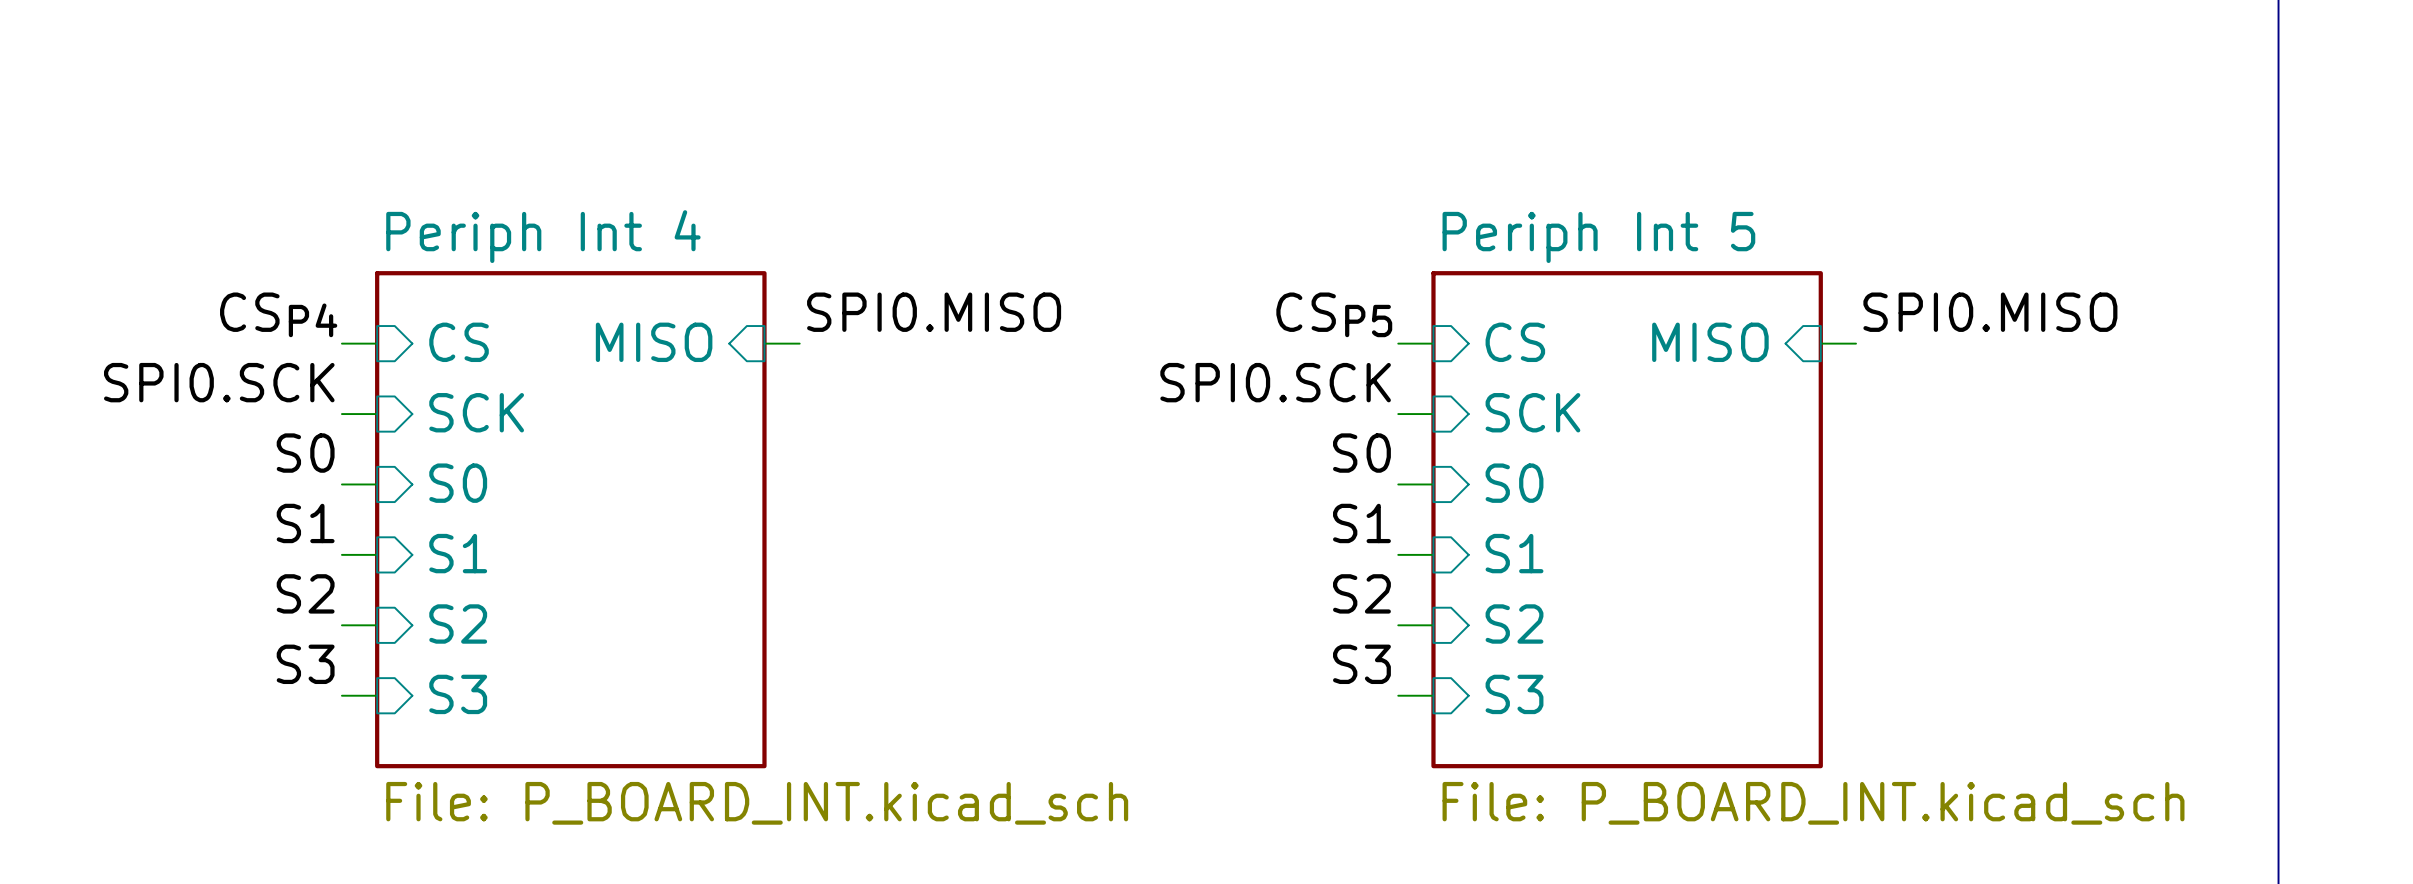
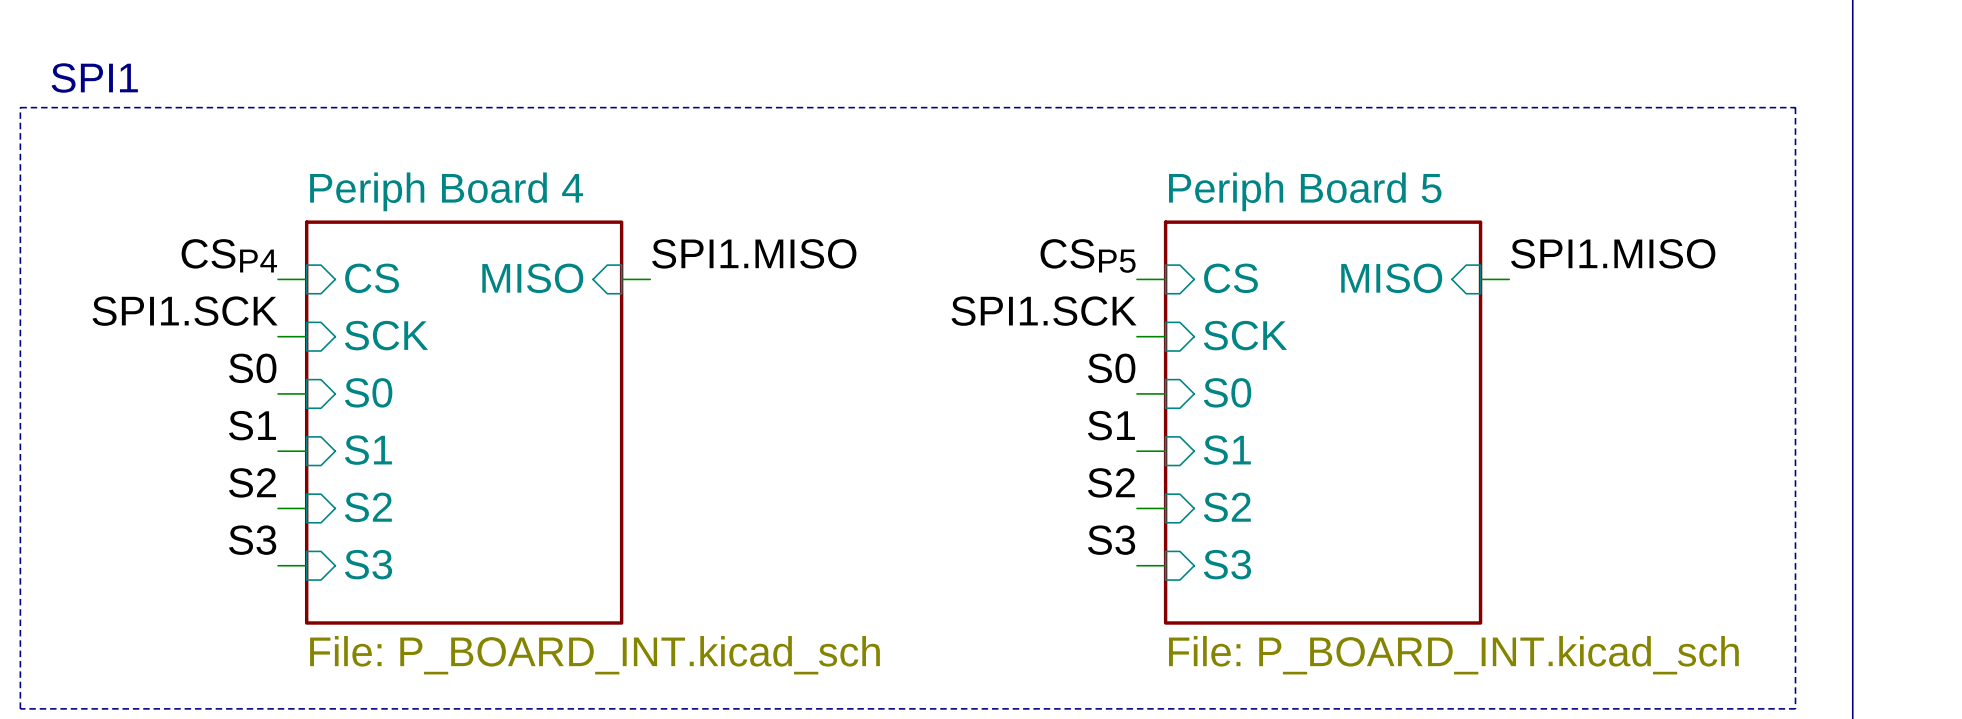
text: none -> SPI1 (94, 78)
line: none -> (20, 107) (1795, 107) (1795, 708) (20, 708) (20, 107)
sheet Periph Int 4 name: Periph Int 4 (543, 236) -> Periph Board 4 (446, 191)
sheet Periph Int 5 name: Periph Int 5 (1598, 237) -> Periph Board 5 (1305, 191)
label: SPI0.MISO (934, 312) -> SPI1.MISO (754, 253)
label: SPI0.MISO (1990, 312) -> SPI1.MISO (1613, 253)
label: SPI0.SCK (219, 382) -> SPI1.SCK (185, 311)
label: SPI0.SCK (1275, 382) -> SPI1.SCK (1044, 311)

